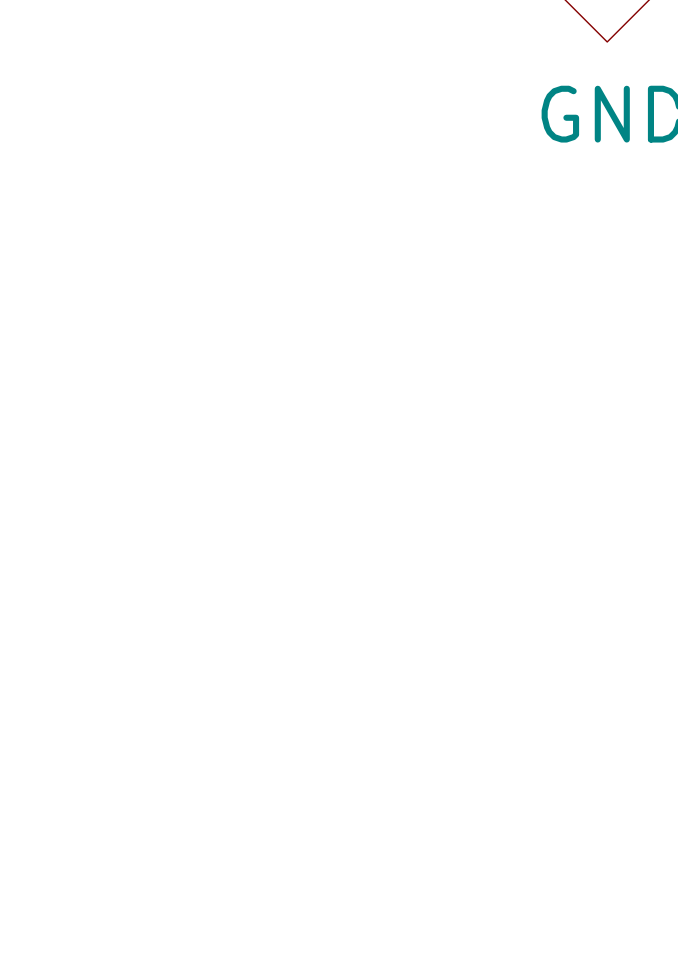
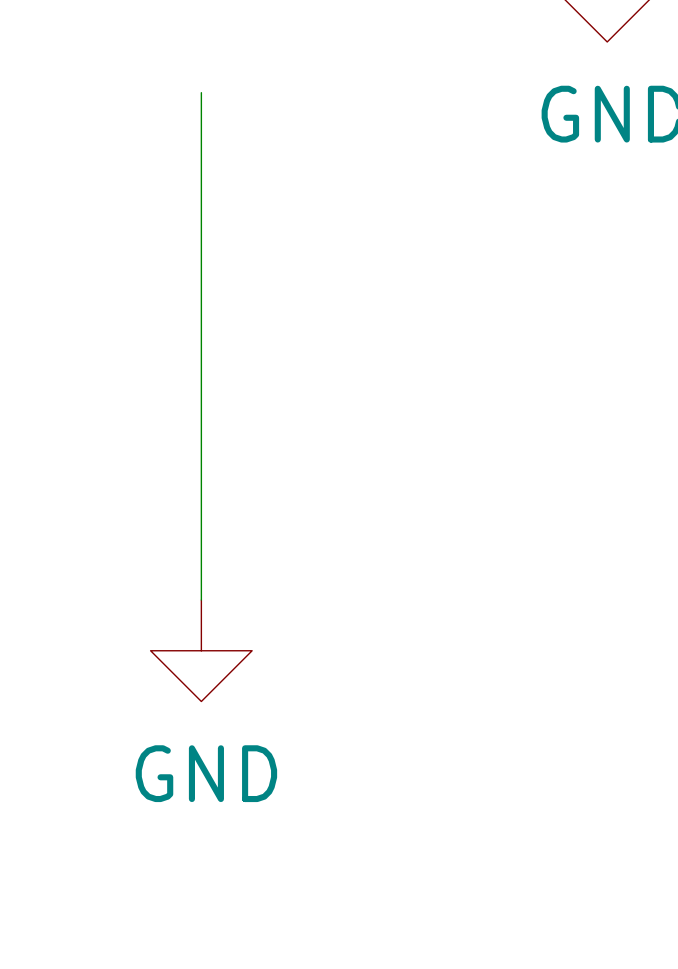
wire: none -> (201, 92) (201, 600)
power symbol: none -> GND (201, 650)

